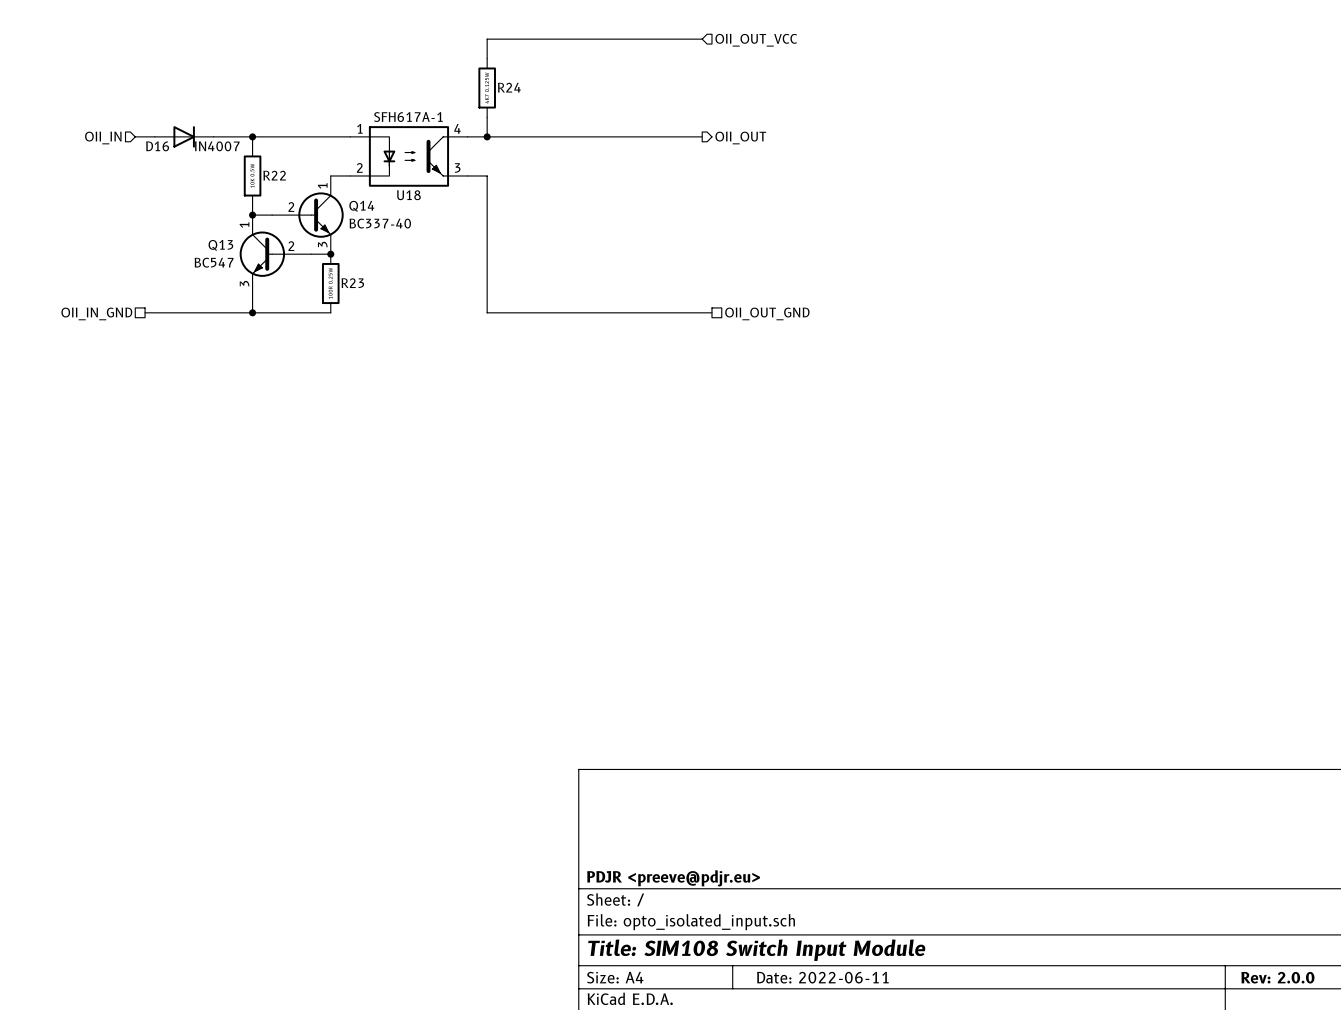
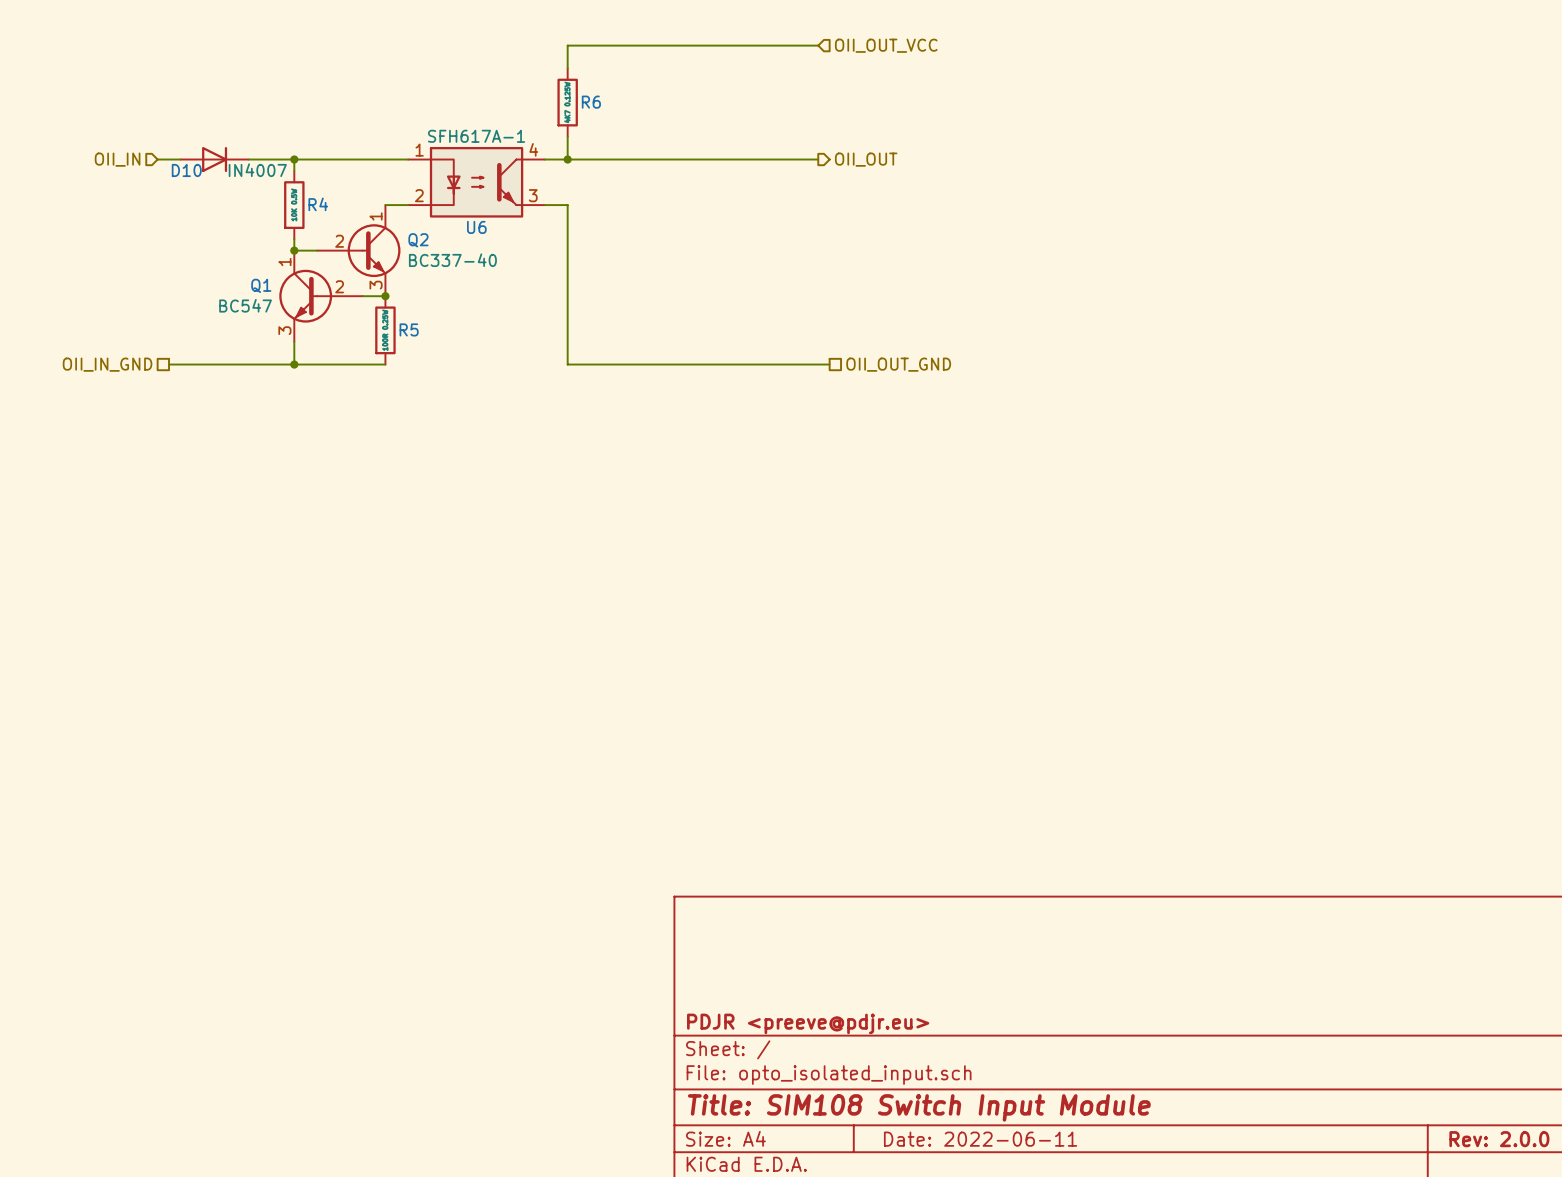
R24 name: R24 (509, 87) -> R6 (591, 102)
D16 name: D16 (157, 146) -> D10 (186, 170)
R22 name: R22 (274, 175) -> R4 (318, 204)
U18 name: U18 (408, 195) -> U6 (476, 227)
Q14 name: Q14 (361, 206) -> Q2 (418, 240)
Q13 name: Q13 (220, 245) -> Q1 (261, 285)
R23 name: R23 (352, 283) -> R5 (409, 329)

